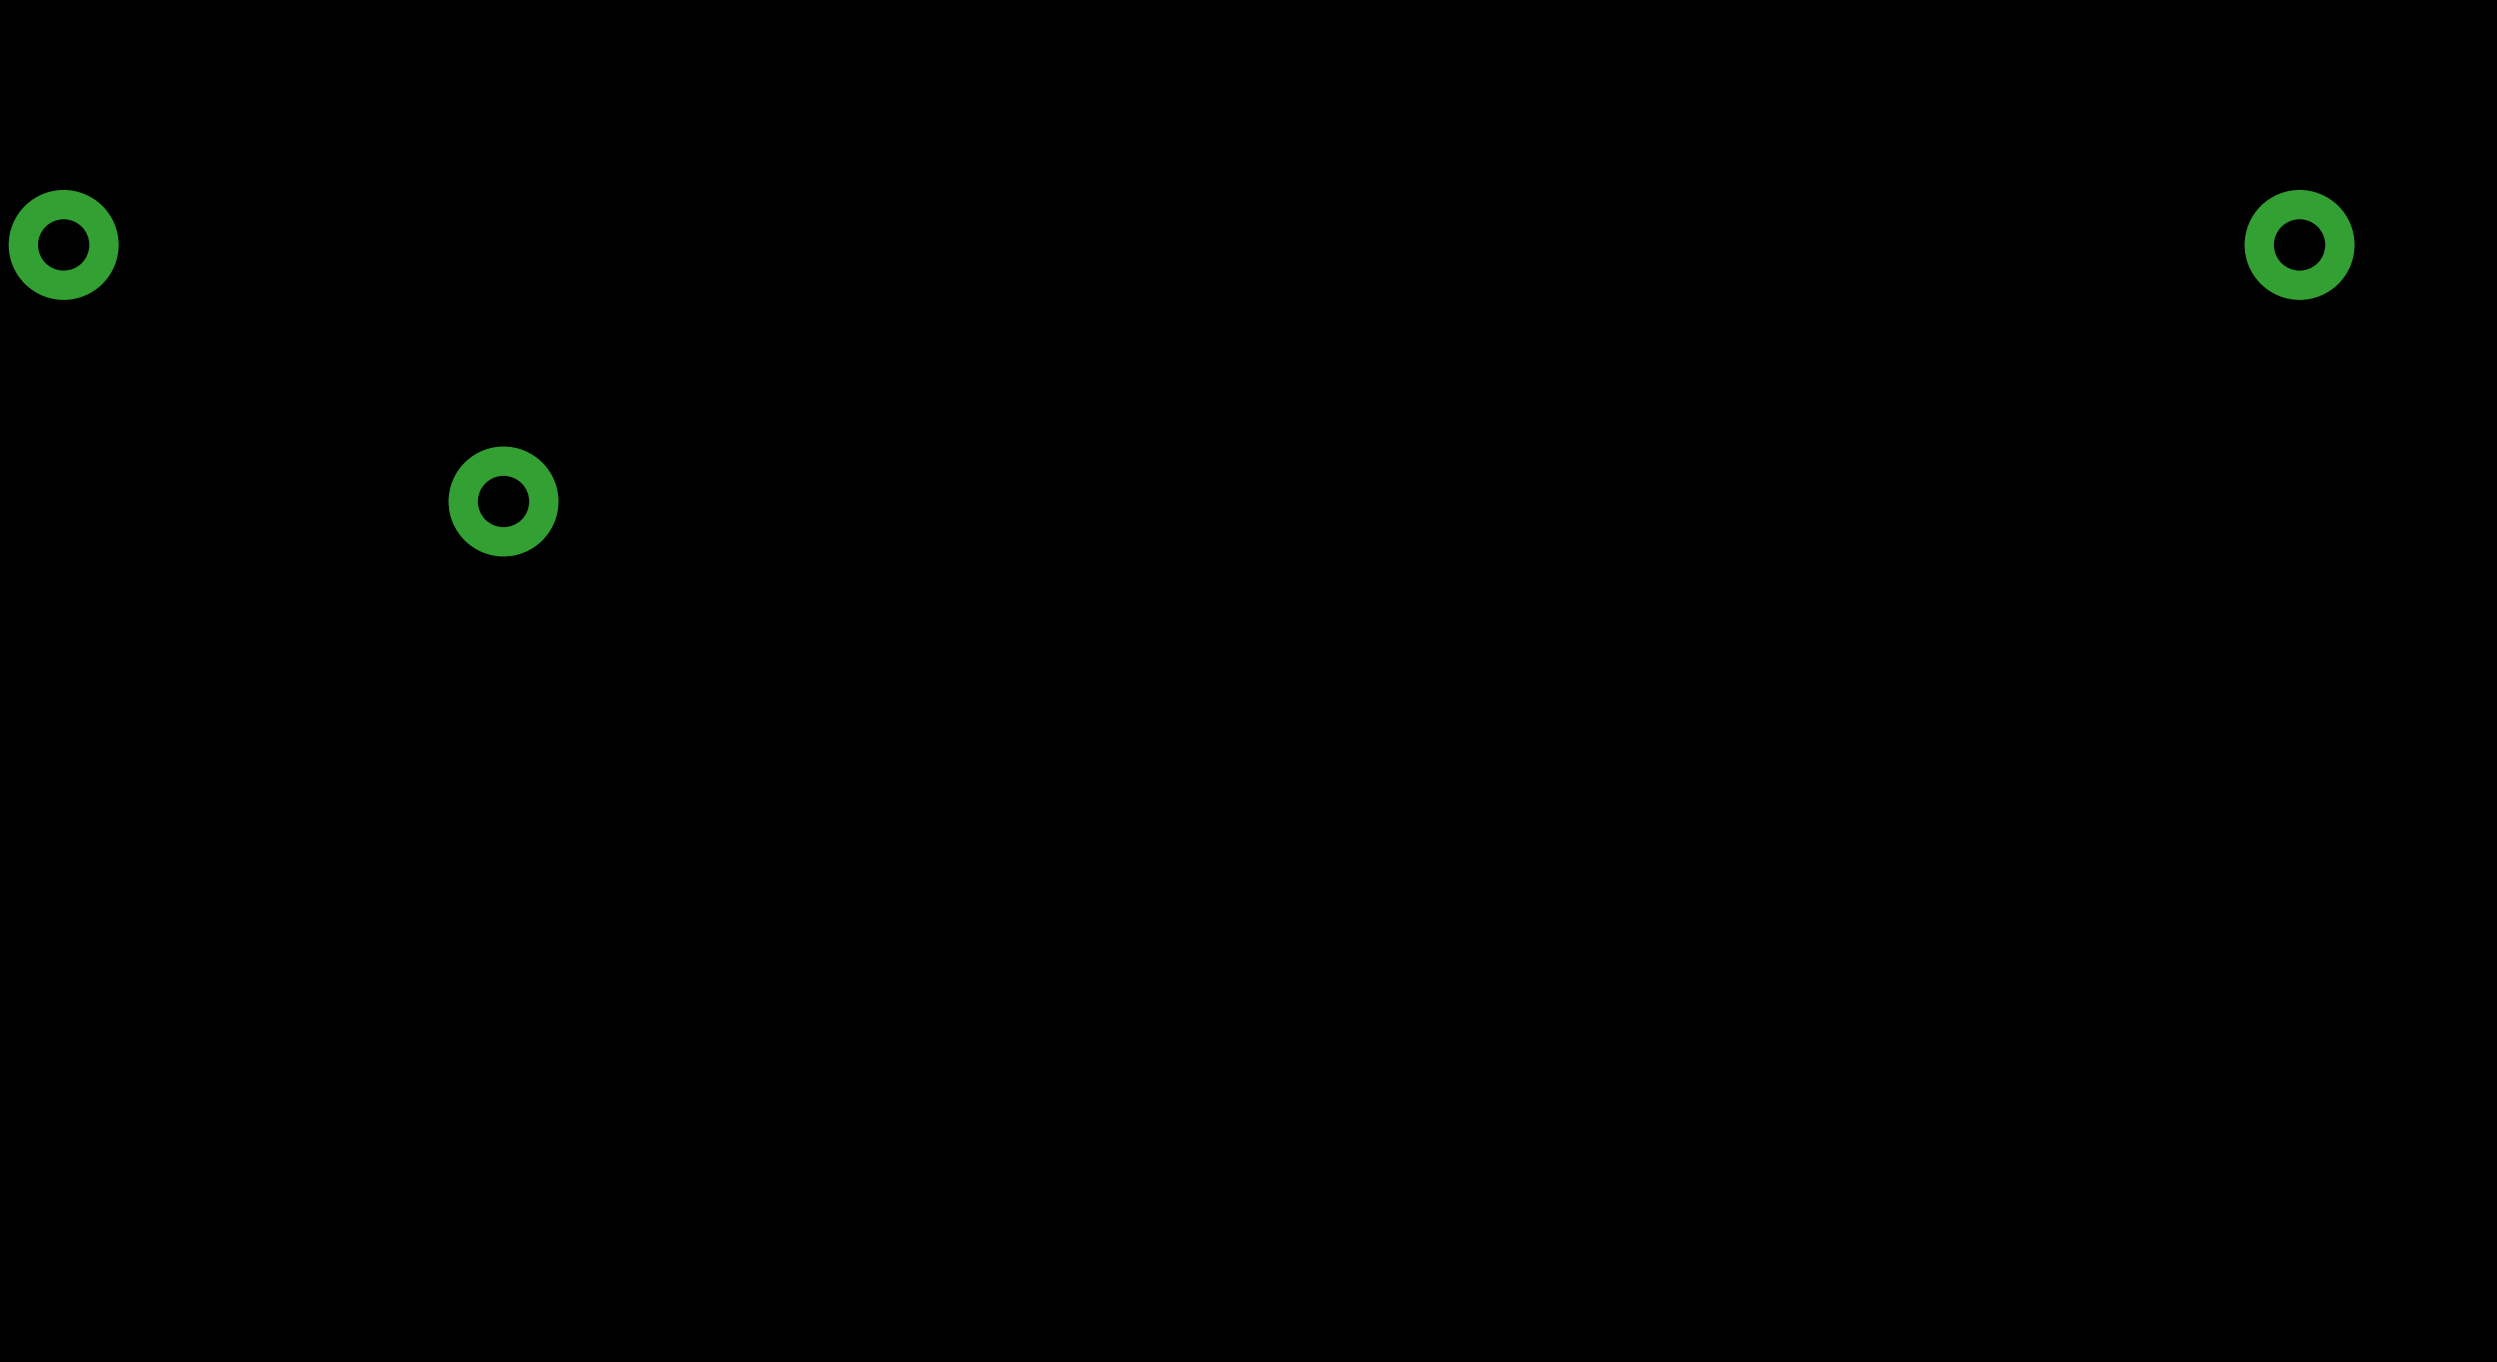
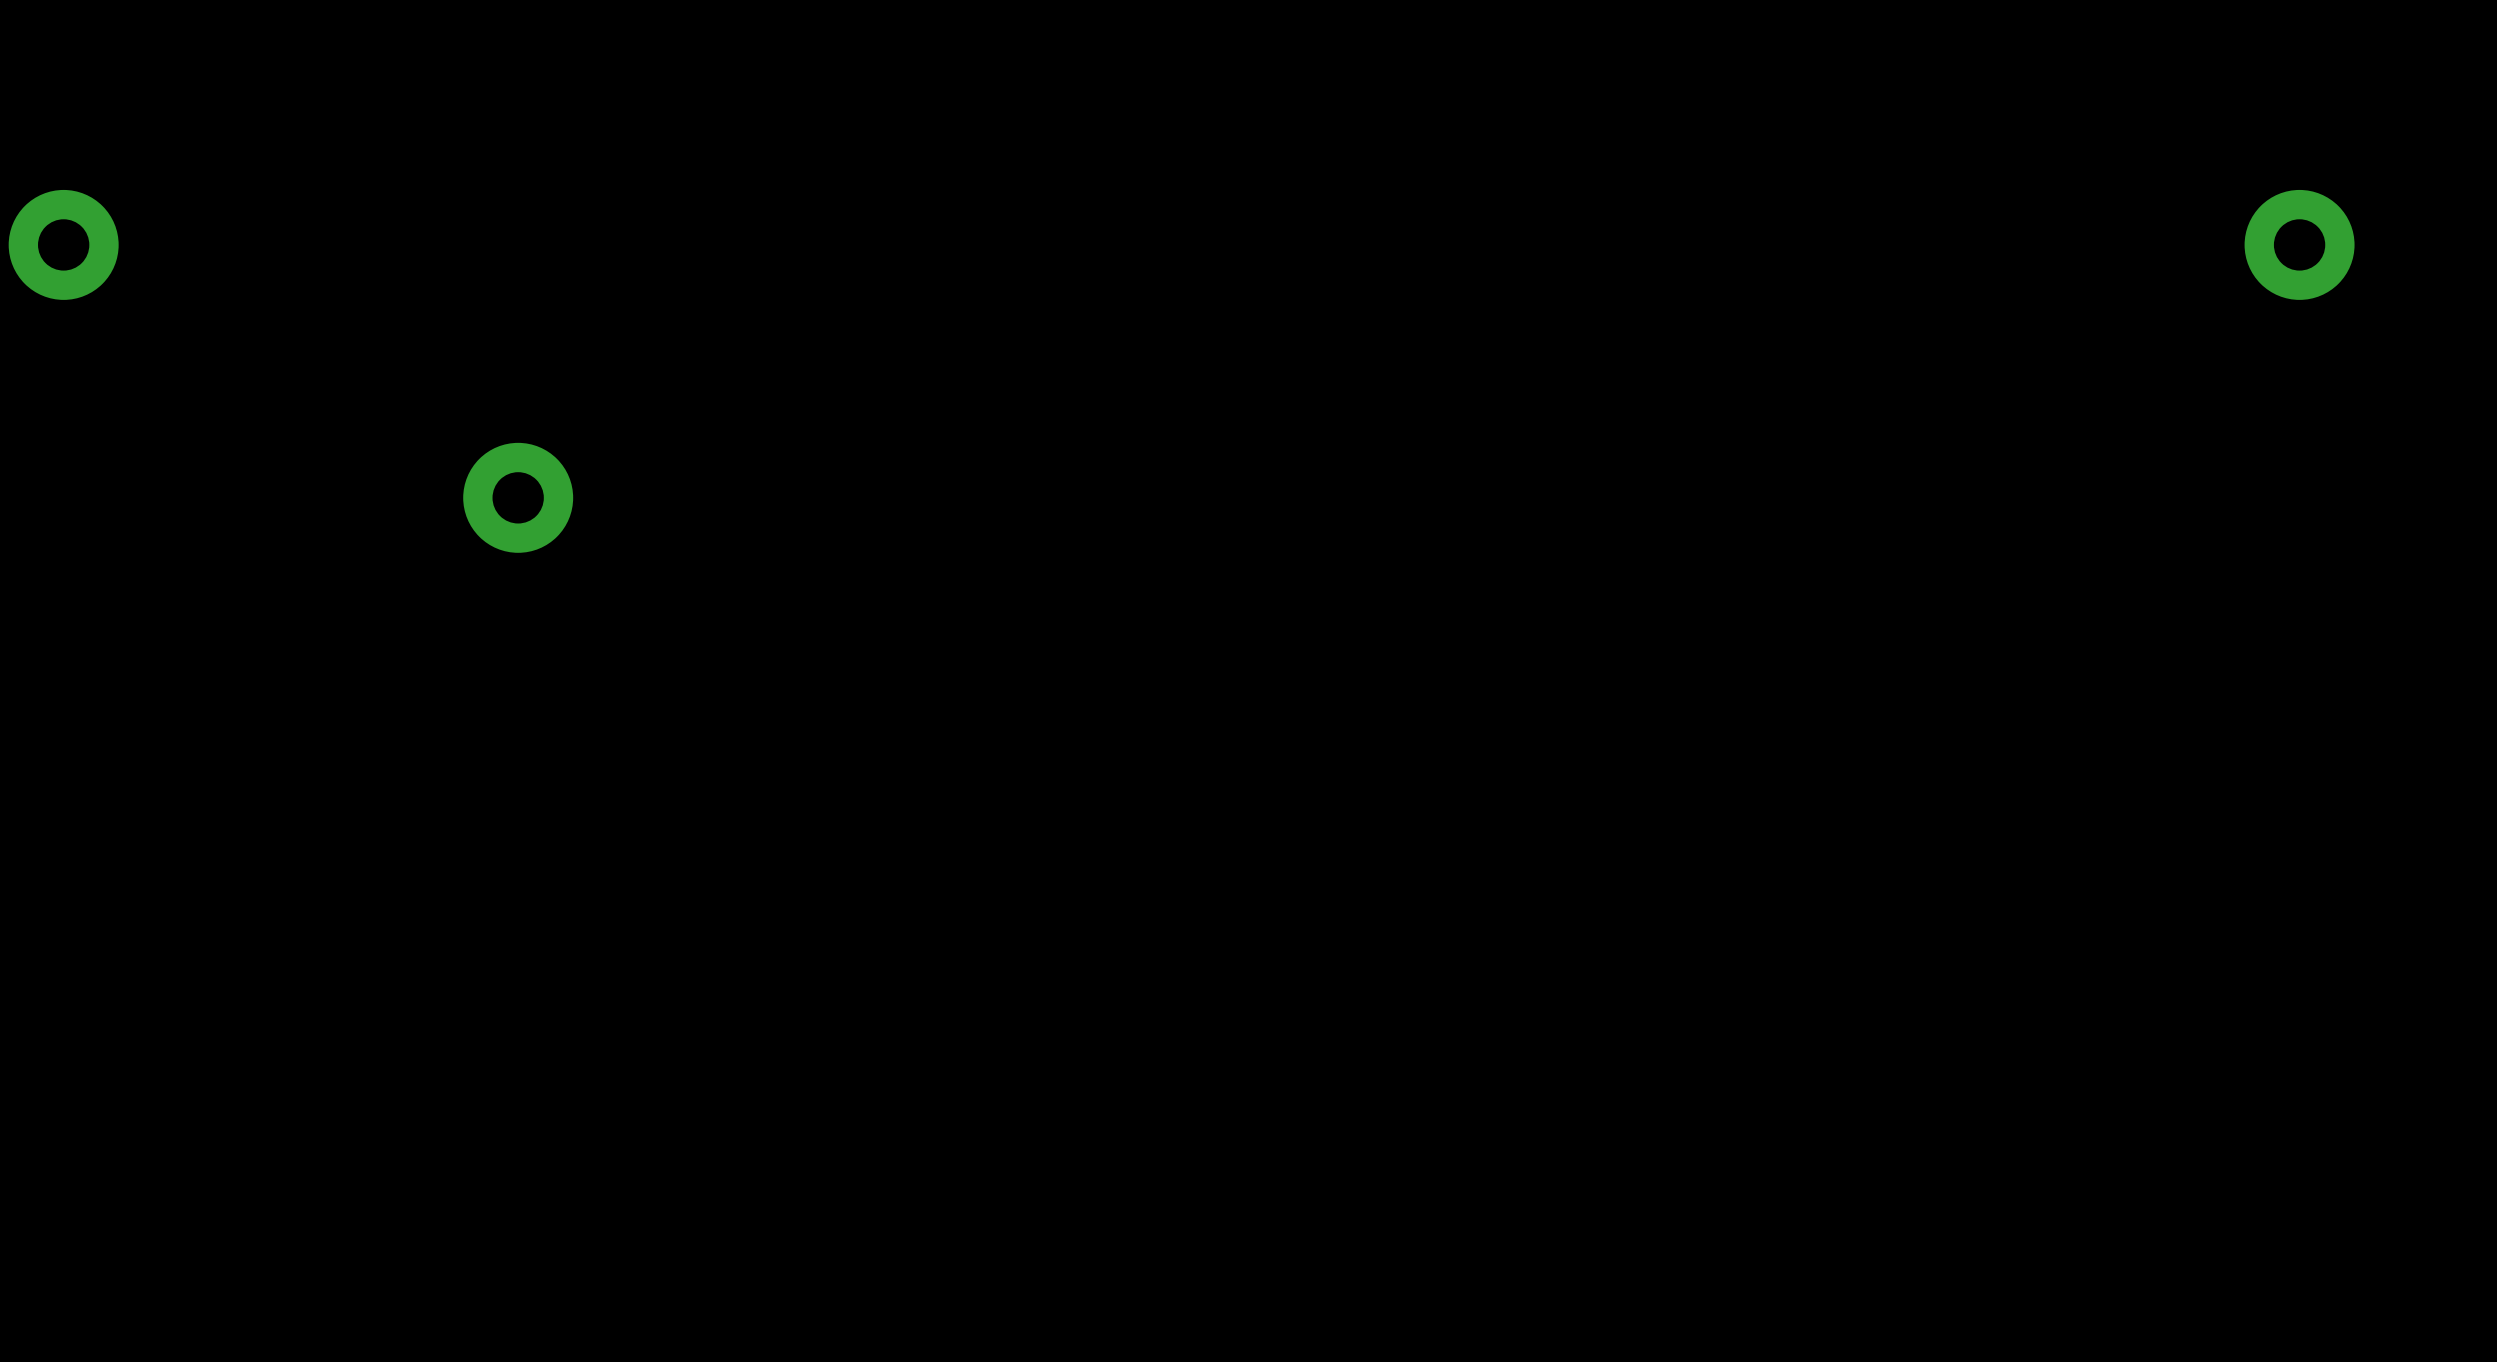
via position: (503, 501) -> (518, 497)

